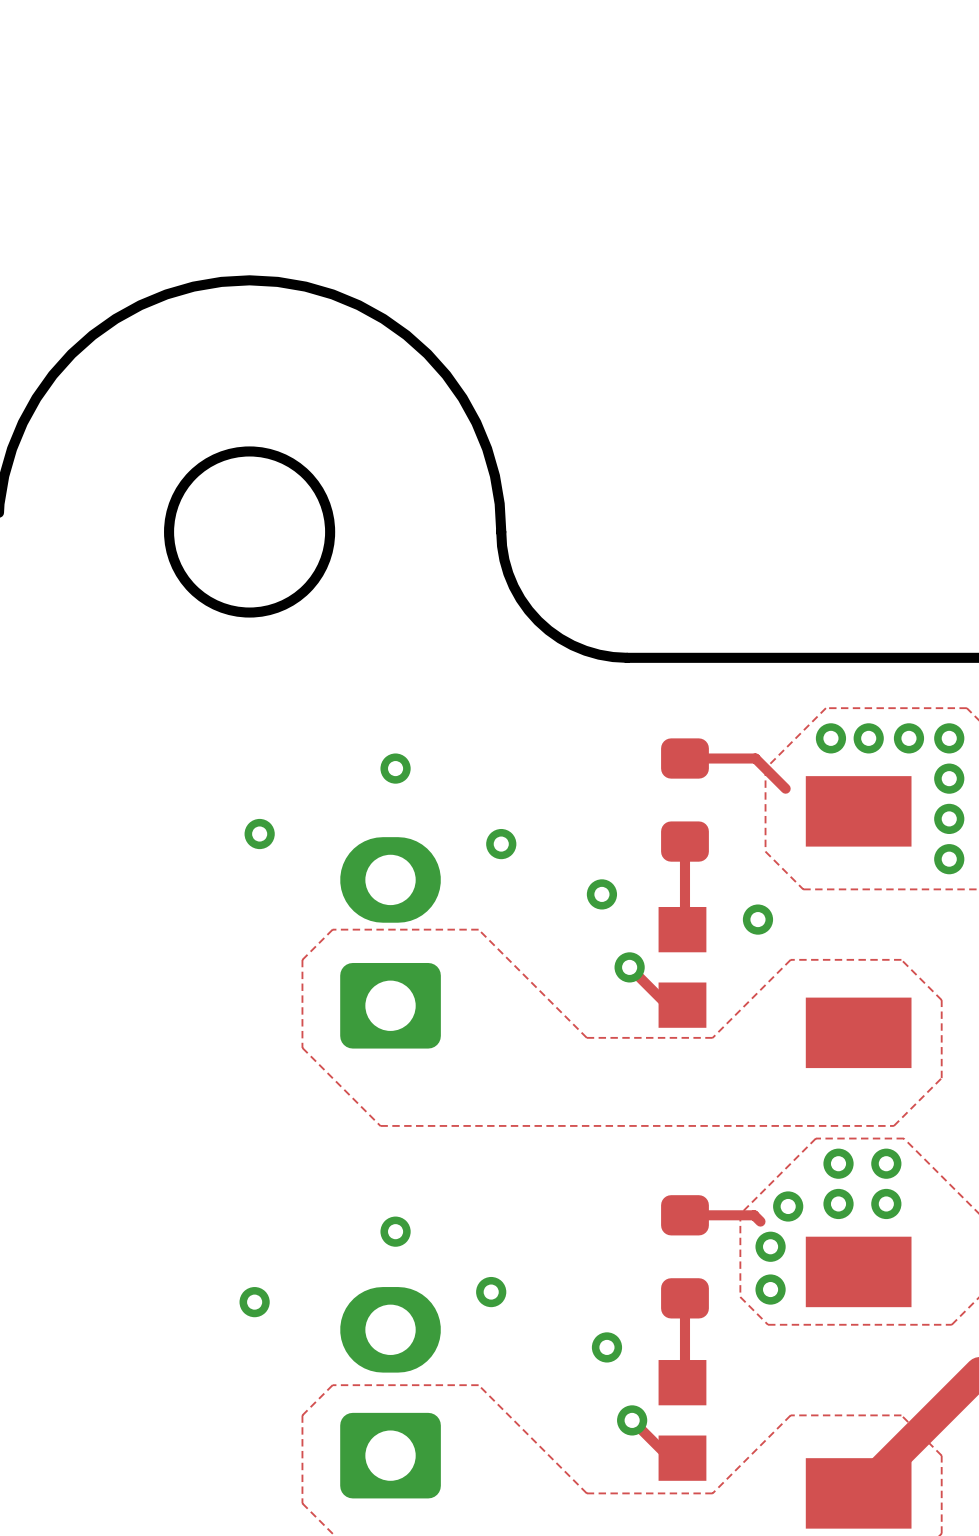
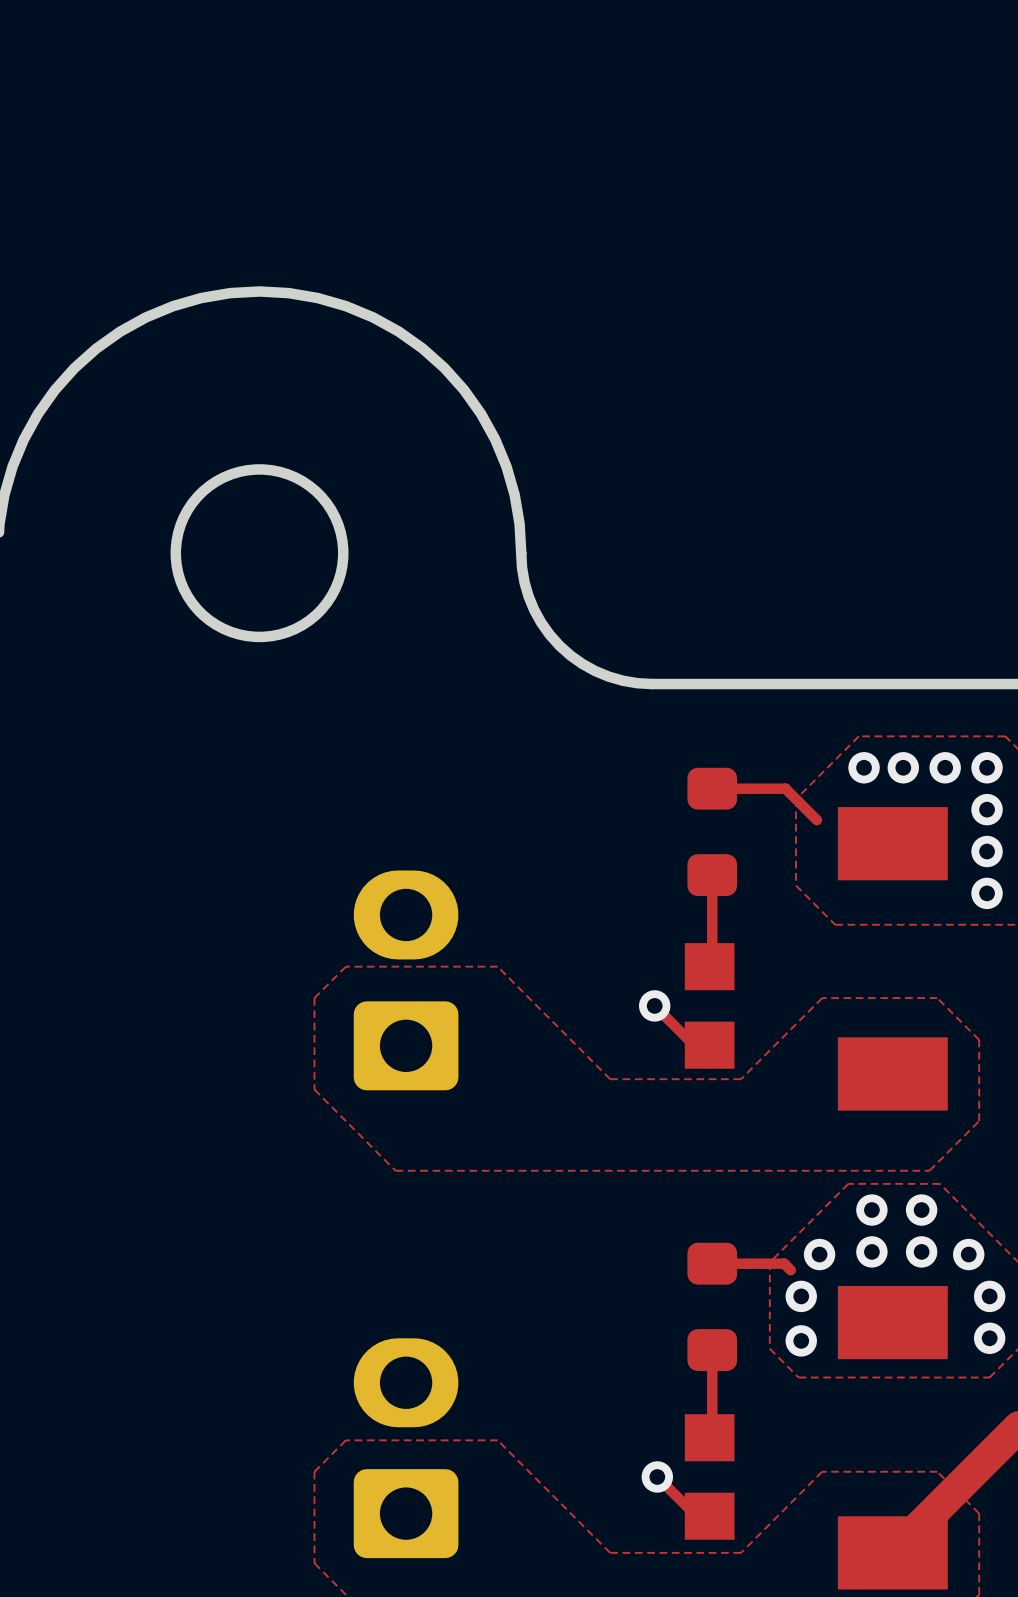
via: (395, 768) -> none
via: (259, 834) -> none
via: (501, 844) -> none
via: (601, 894) -> none
via: (757, 919) -> none
via: none -> (968, 1254)
via: (395, 1231) -> none
via: none -> (989, 1296)
via: none -> (989, 1338)
via: (491, 1292) -> none
via: (254, 1302) -> none
via: (606, 1347) -> none

